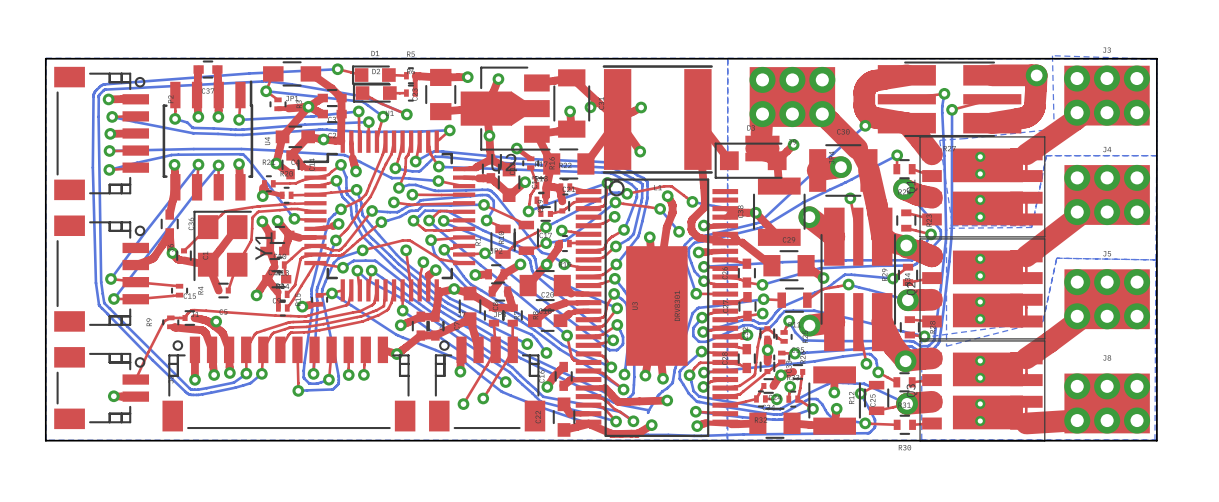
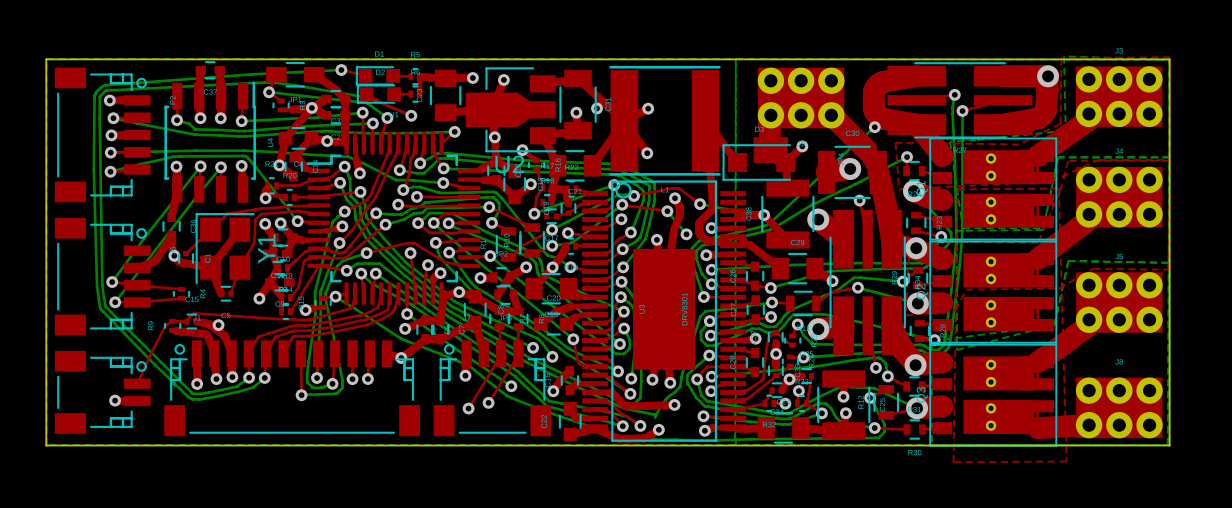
top zone outline: none -> (1170, 57) (1061, 58) (1060, 123) (1019, 144) (895, 142) (899, 189) (1051, 181) (1098, 159) (1169, 159) (1170, 57)
top zone outline: none -> (1068, 160) (1170, 160) (1168, 269) (1093, 268) (1058, 288) (966, 289) (955, 310) (905, 315) (909, 245) (949, 242) (1038, 242) (1059, 191) (1068, 160)
top zone outline: none -> (1058, 188) (957, 189) (953, 462) (1066, 461) (1058, 188)

